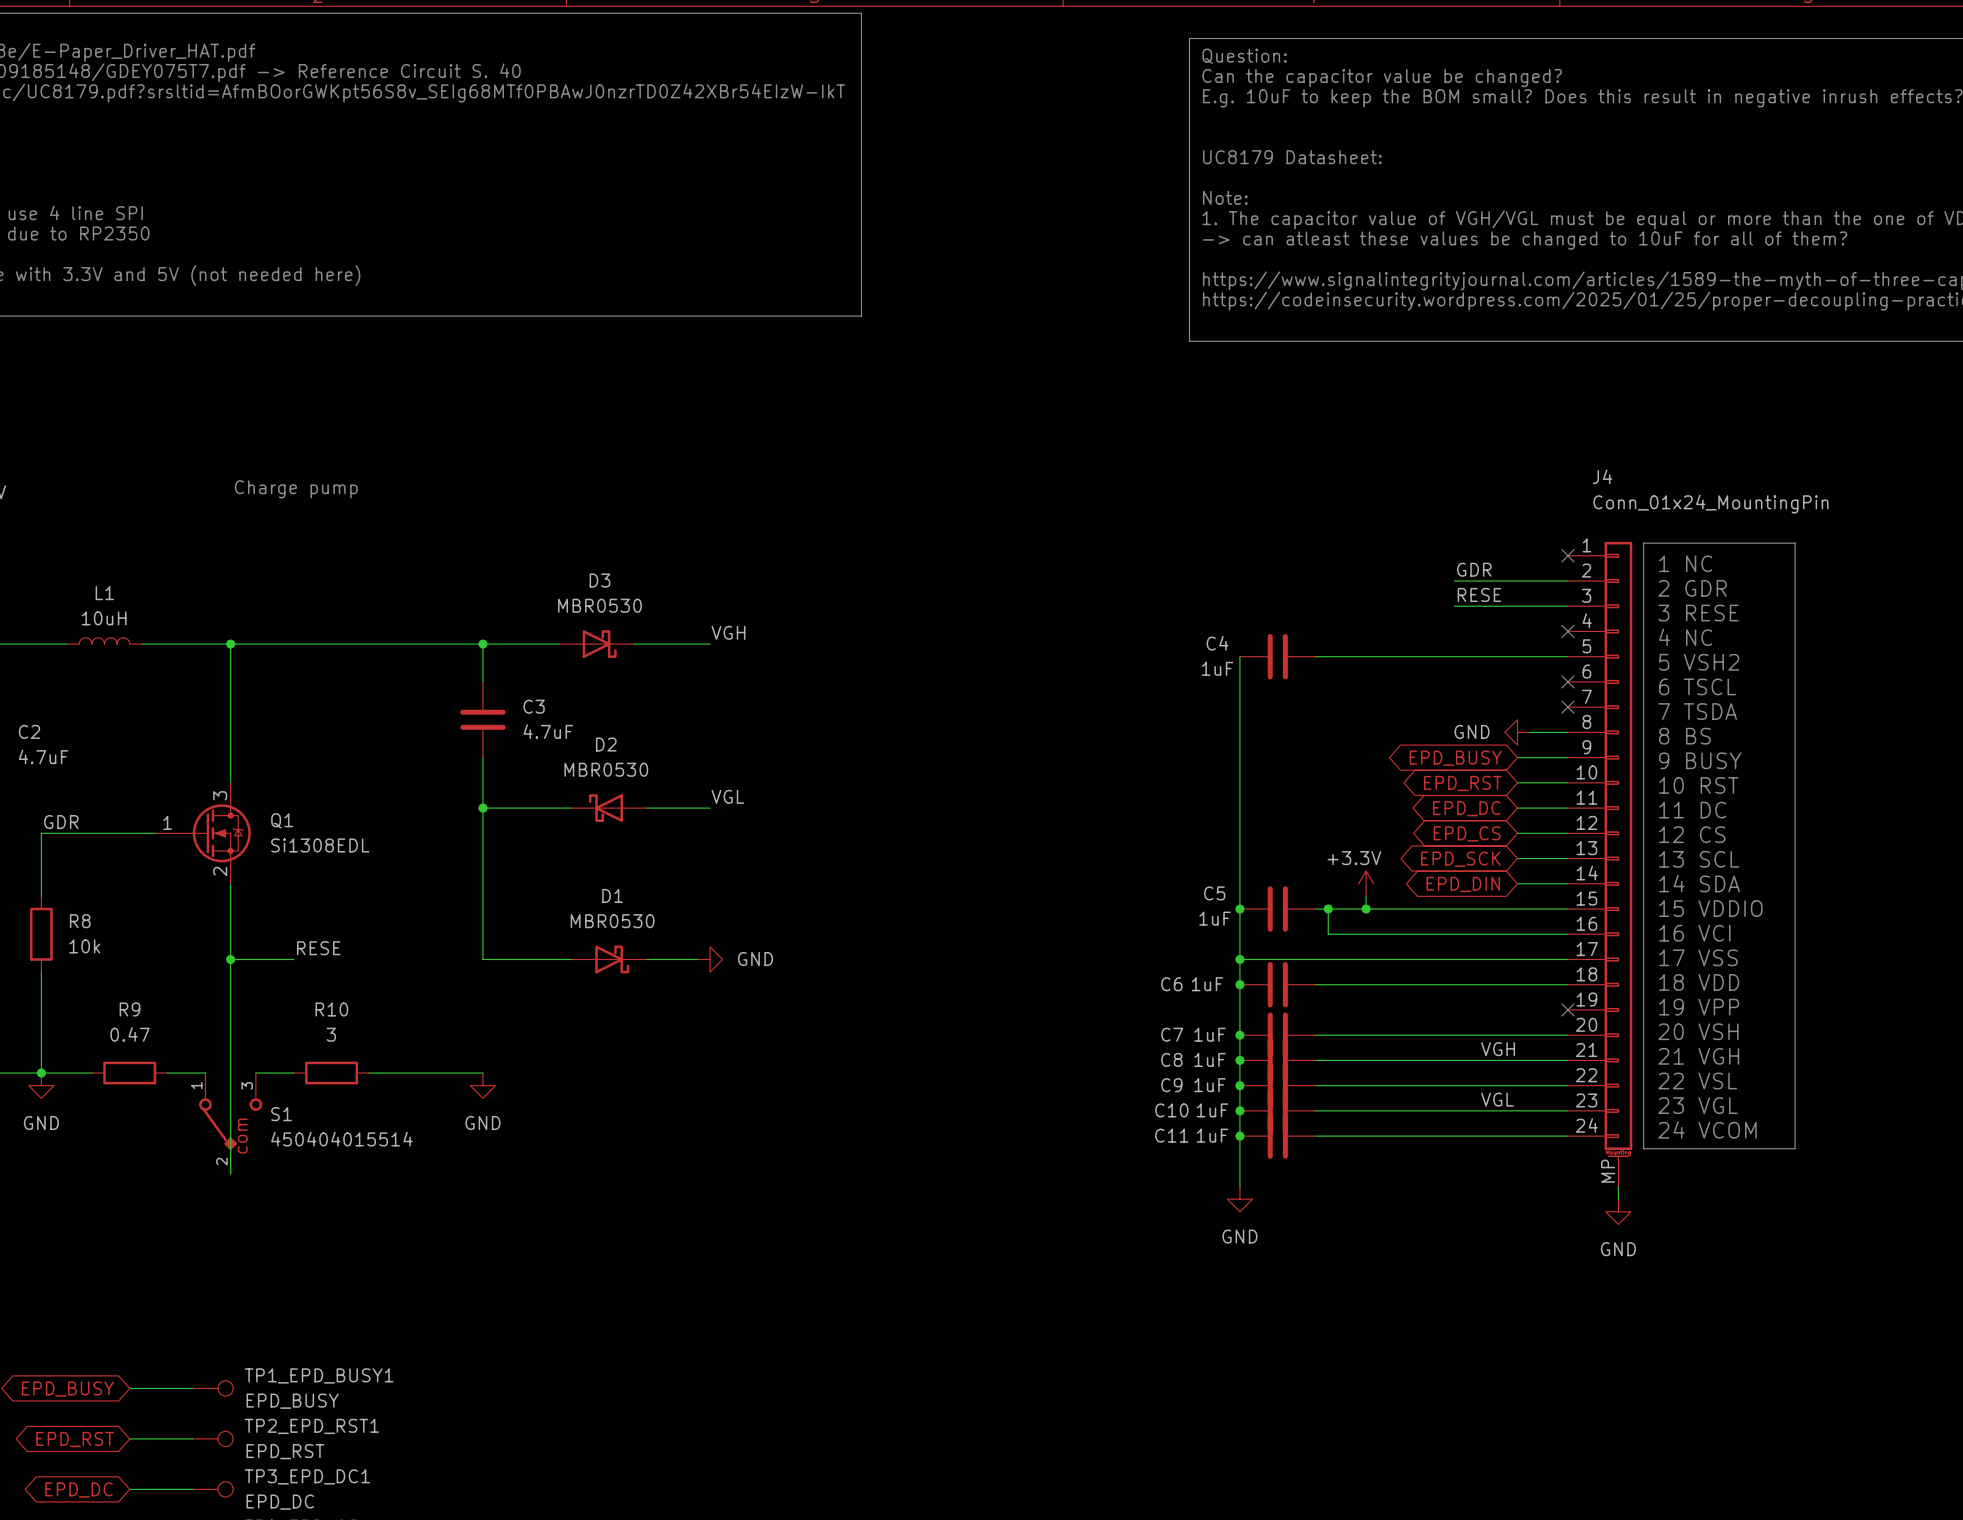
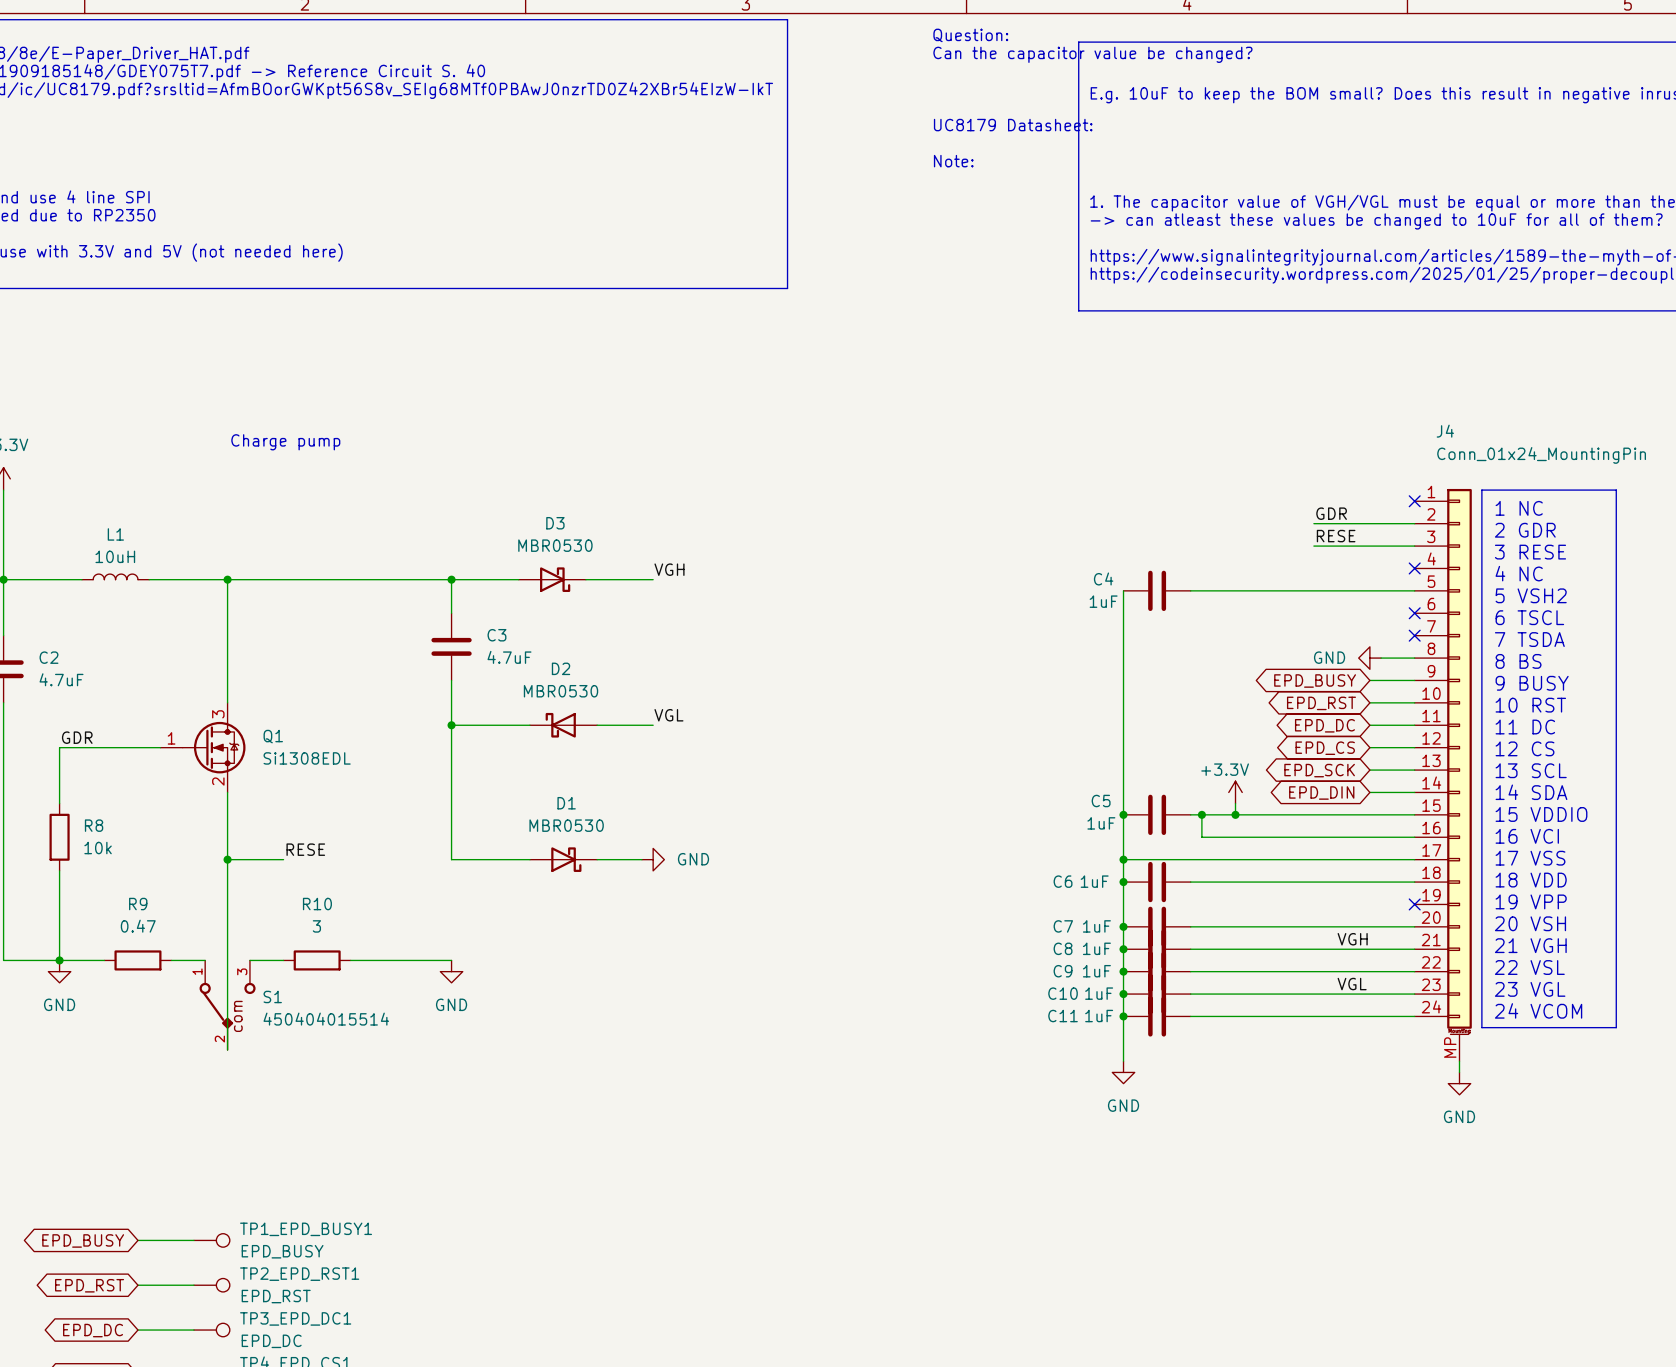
text position: Question: (1244, 56) -> Question: (970, 35)
text position: Can the capacitor value be changed? (1382, 78) -> Can the capacitor value be changed? (1092, 54)
text position: UC8179 Datasheet: (1292, 157) -> UC8179 Datasheet: (1013, 125)
text position: Note: (1225, 197) -> Note: (953, 161)

